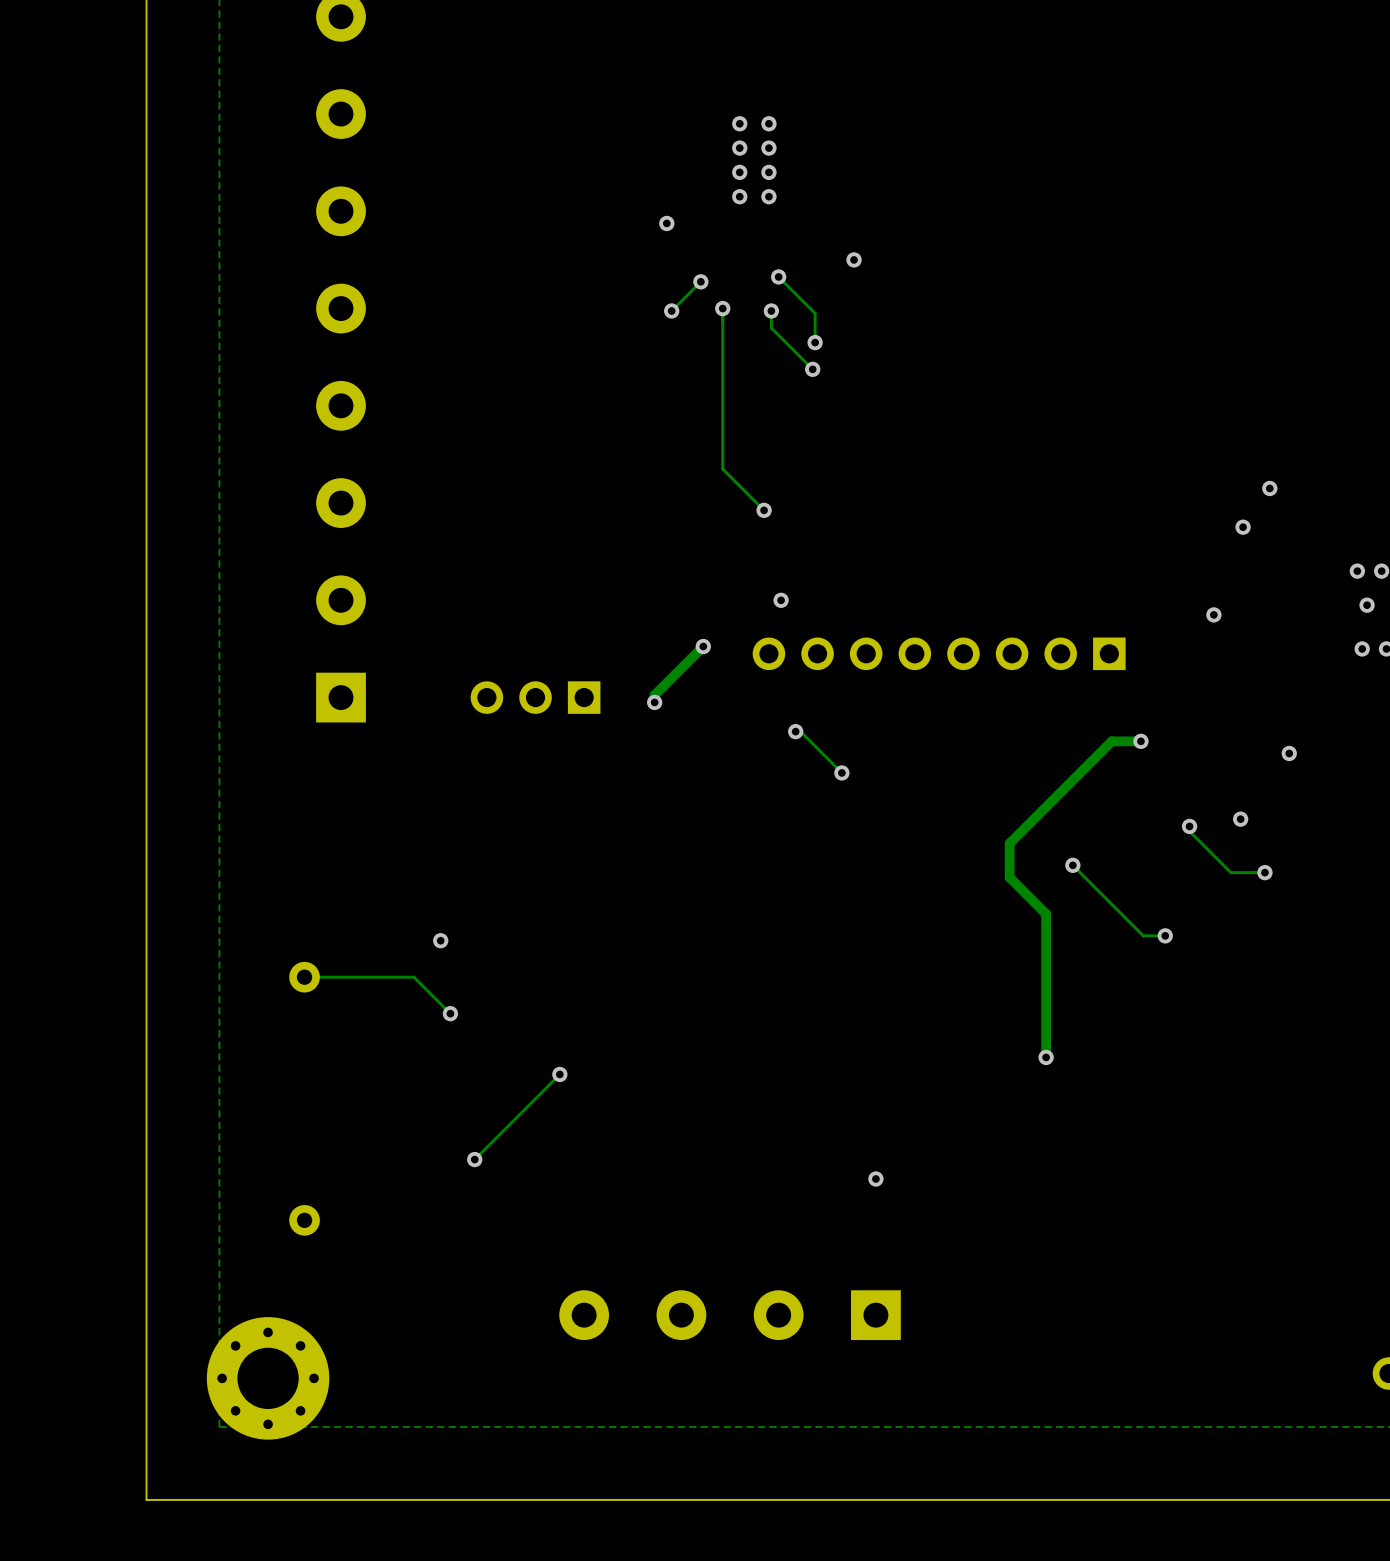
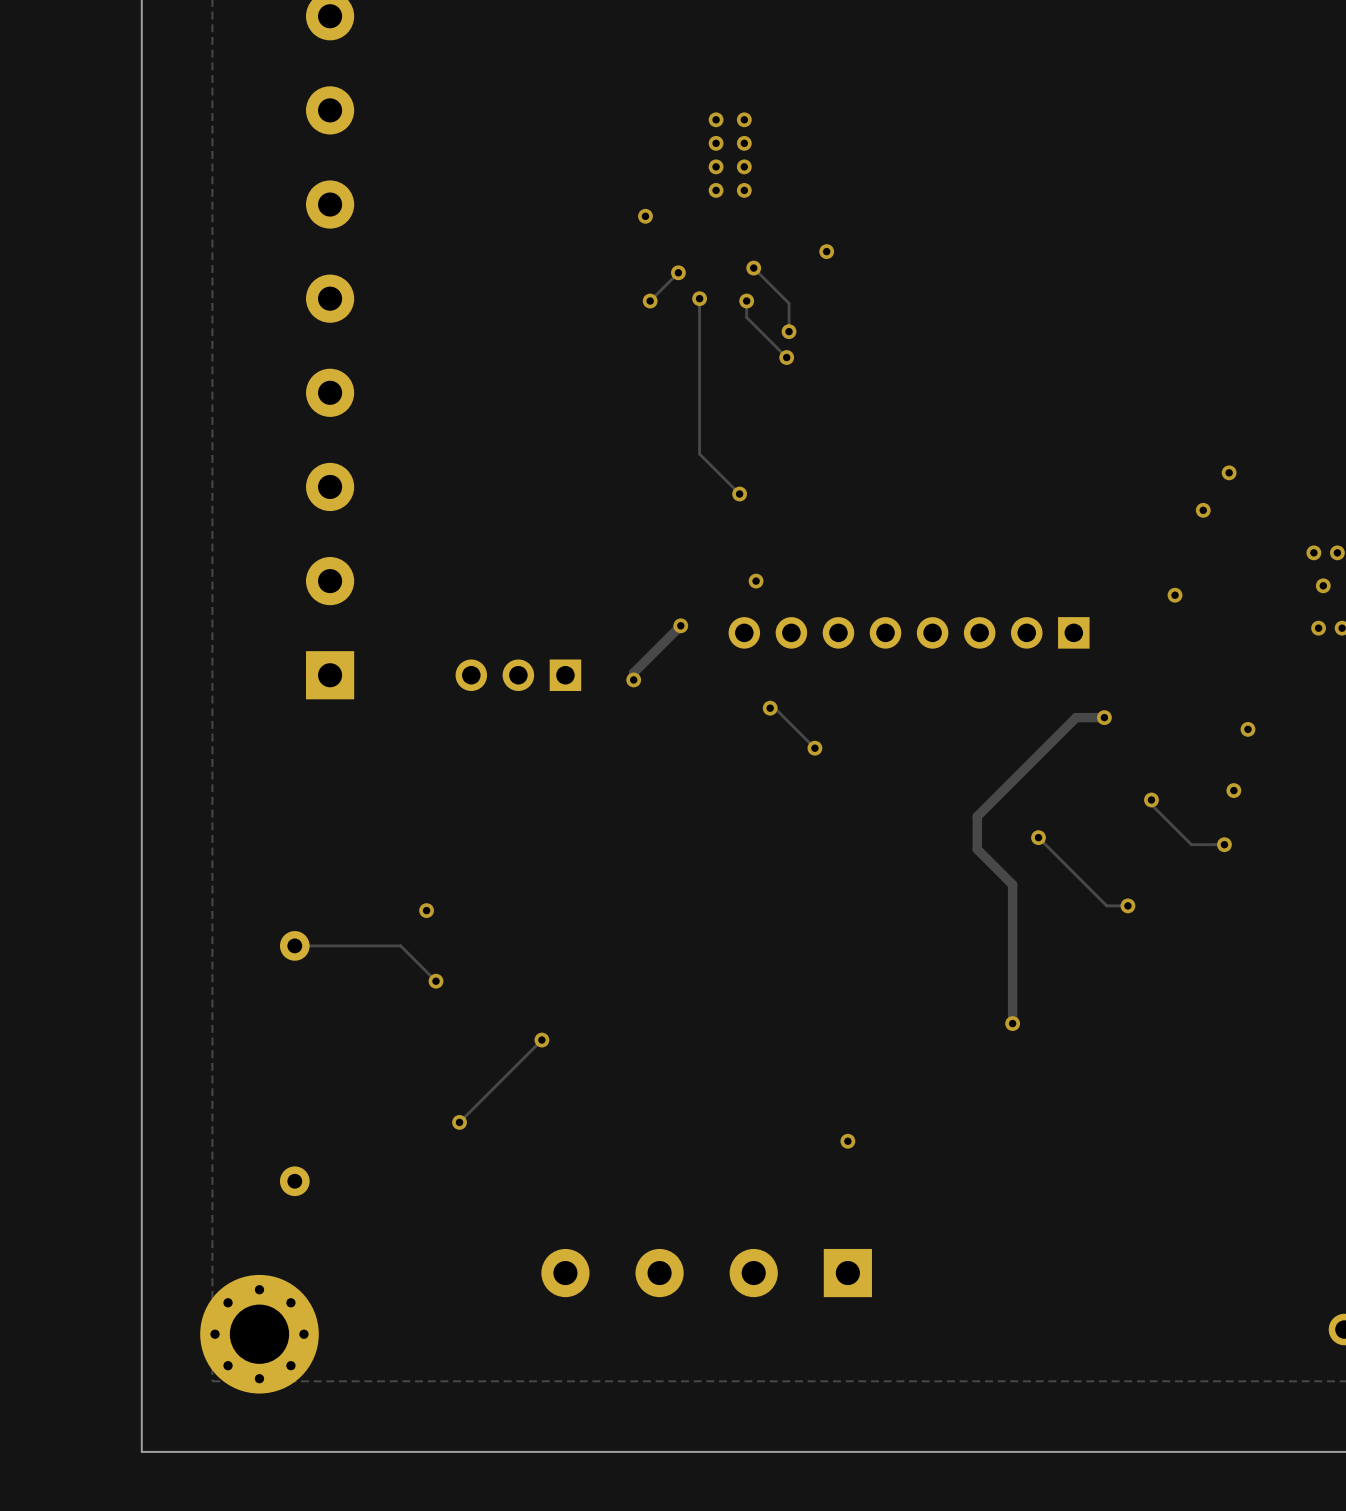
via position: (1240, 819) -> (1233, 790)

